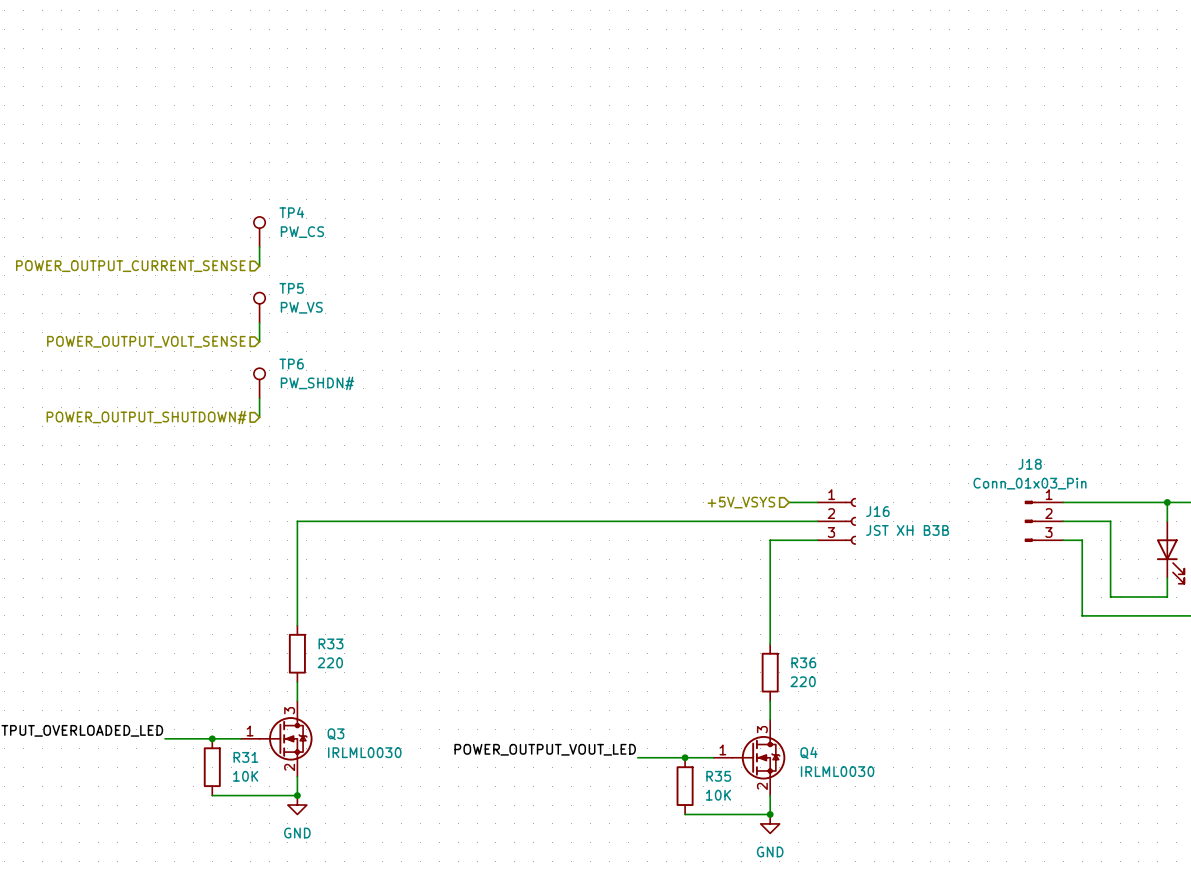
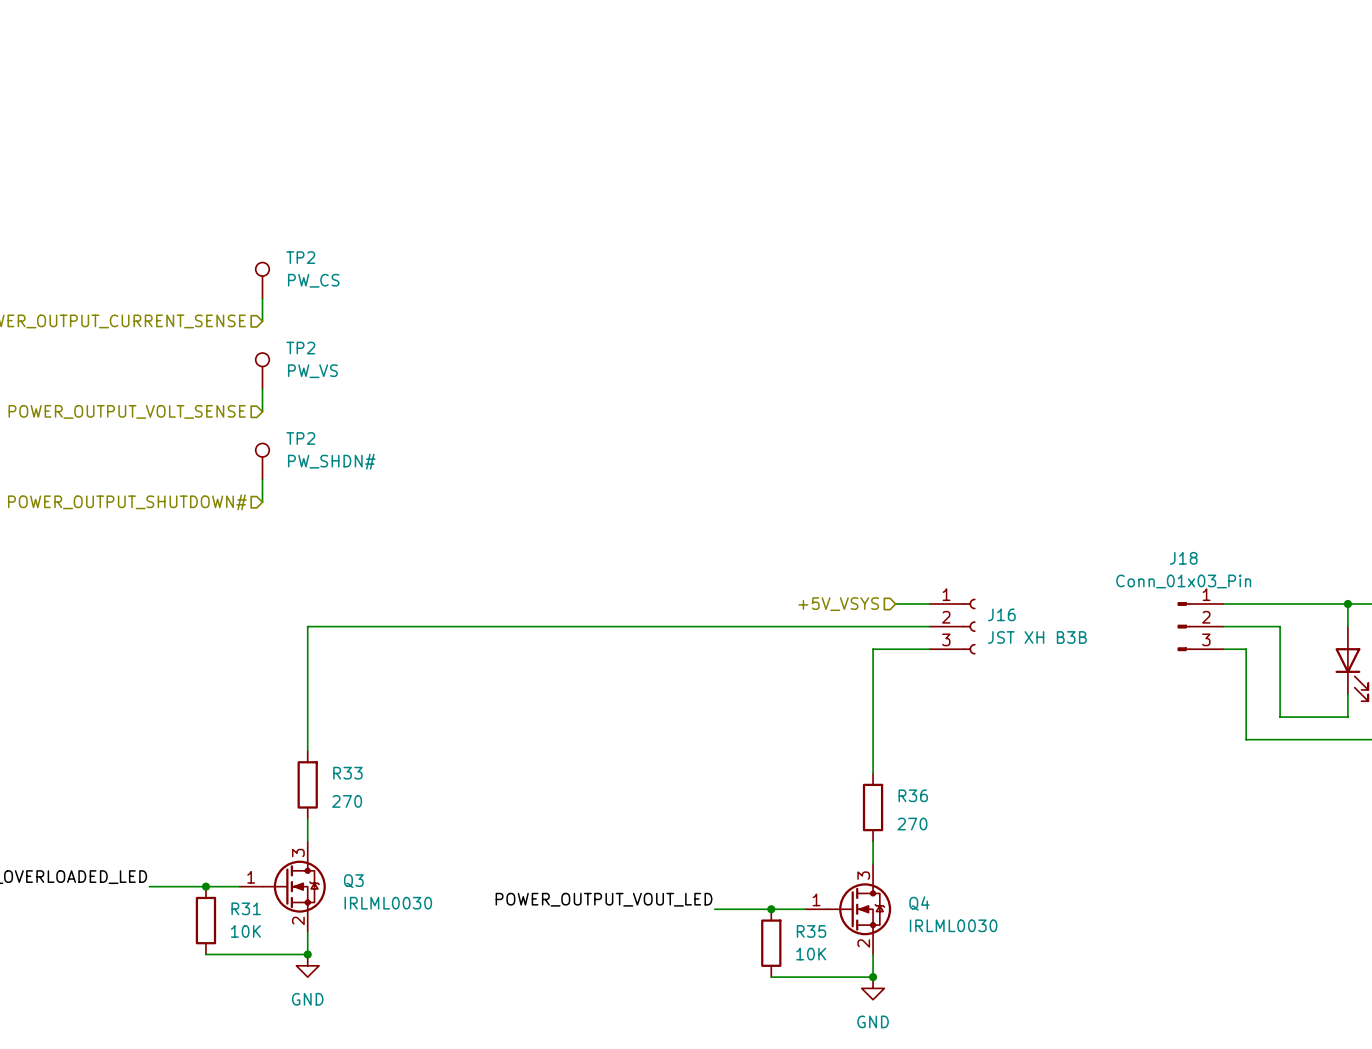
TP4 name: TP4 (291, 212) -> TP2 (300, 257)
TP5 name: TP5 (291, 288) -> TP2 (300, 348)
TP6 name: TP6 (291, 364) -> TP2 (300, 438)
R33 value: 220 (330, 662) -> 270 (347, 801)
R36 value: 220 (803, 681) -> 270 (912, 824)

